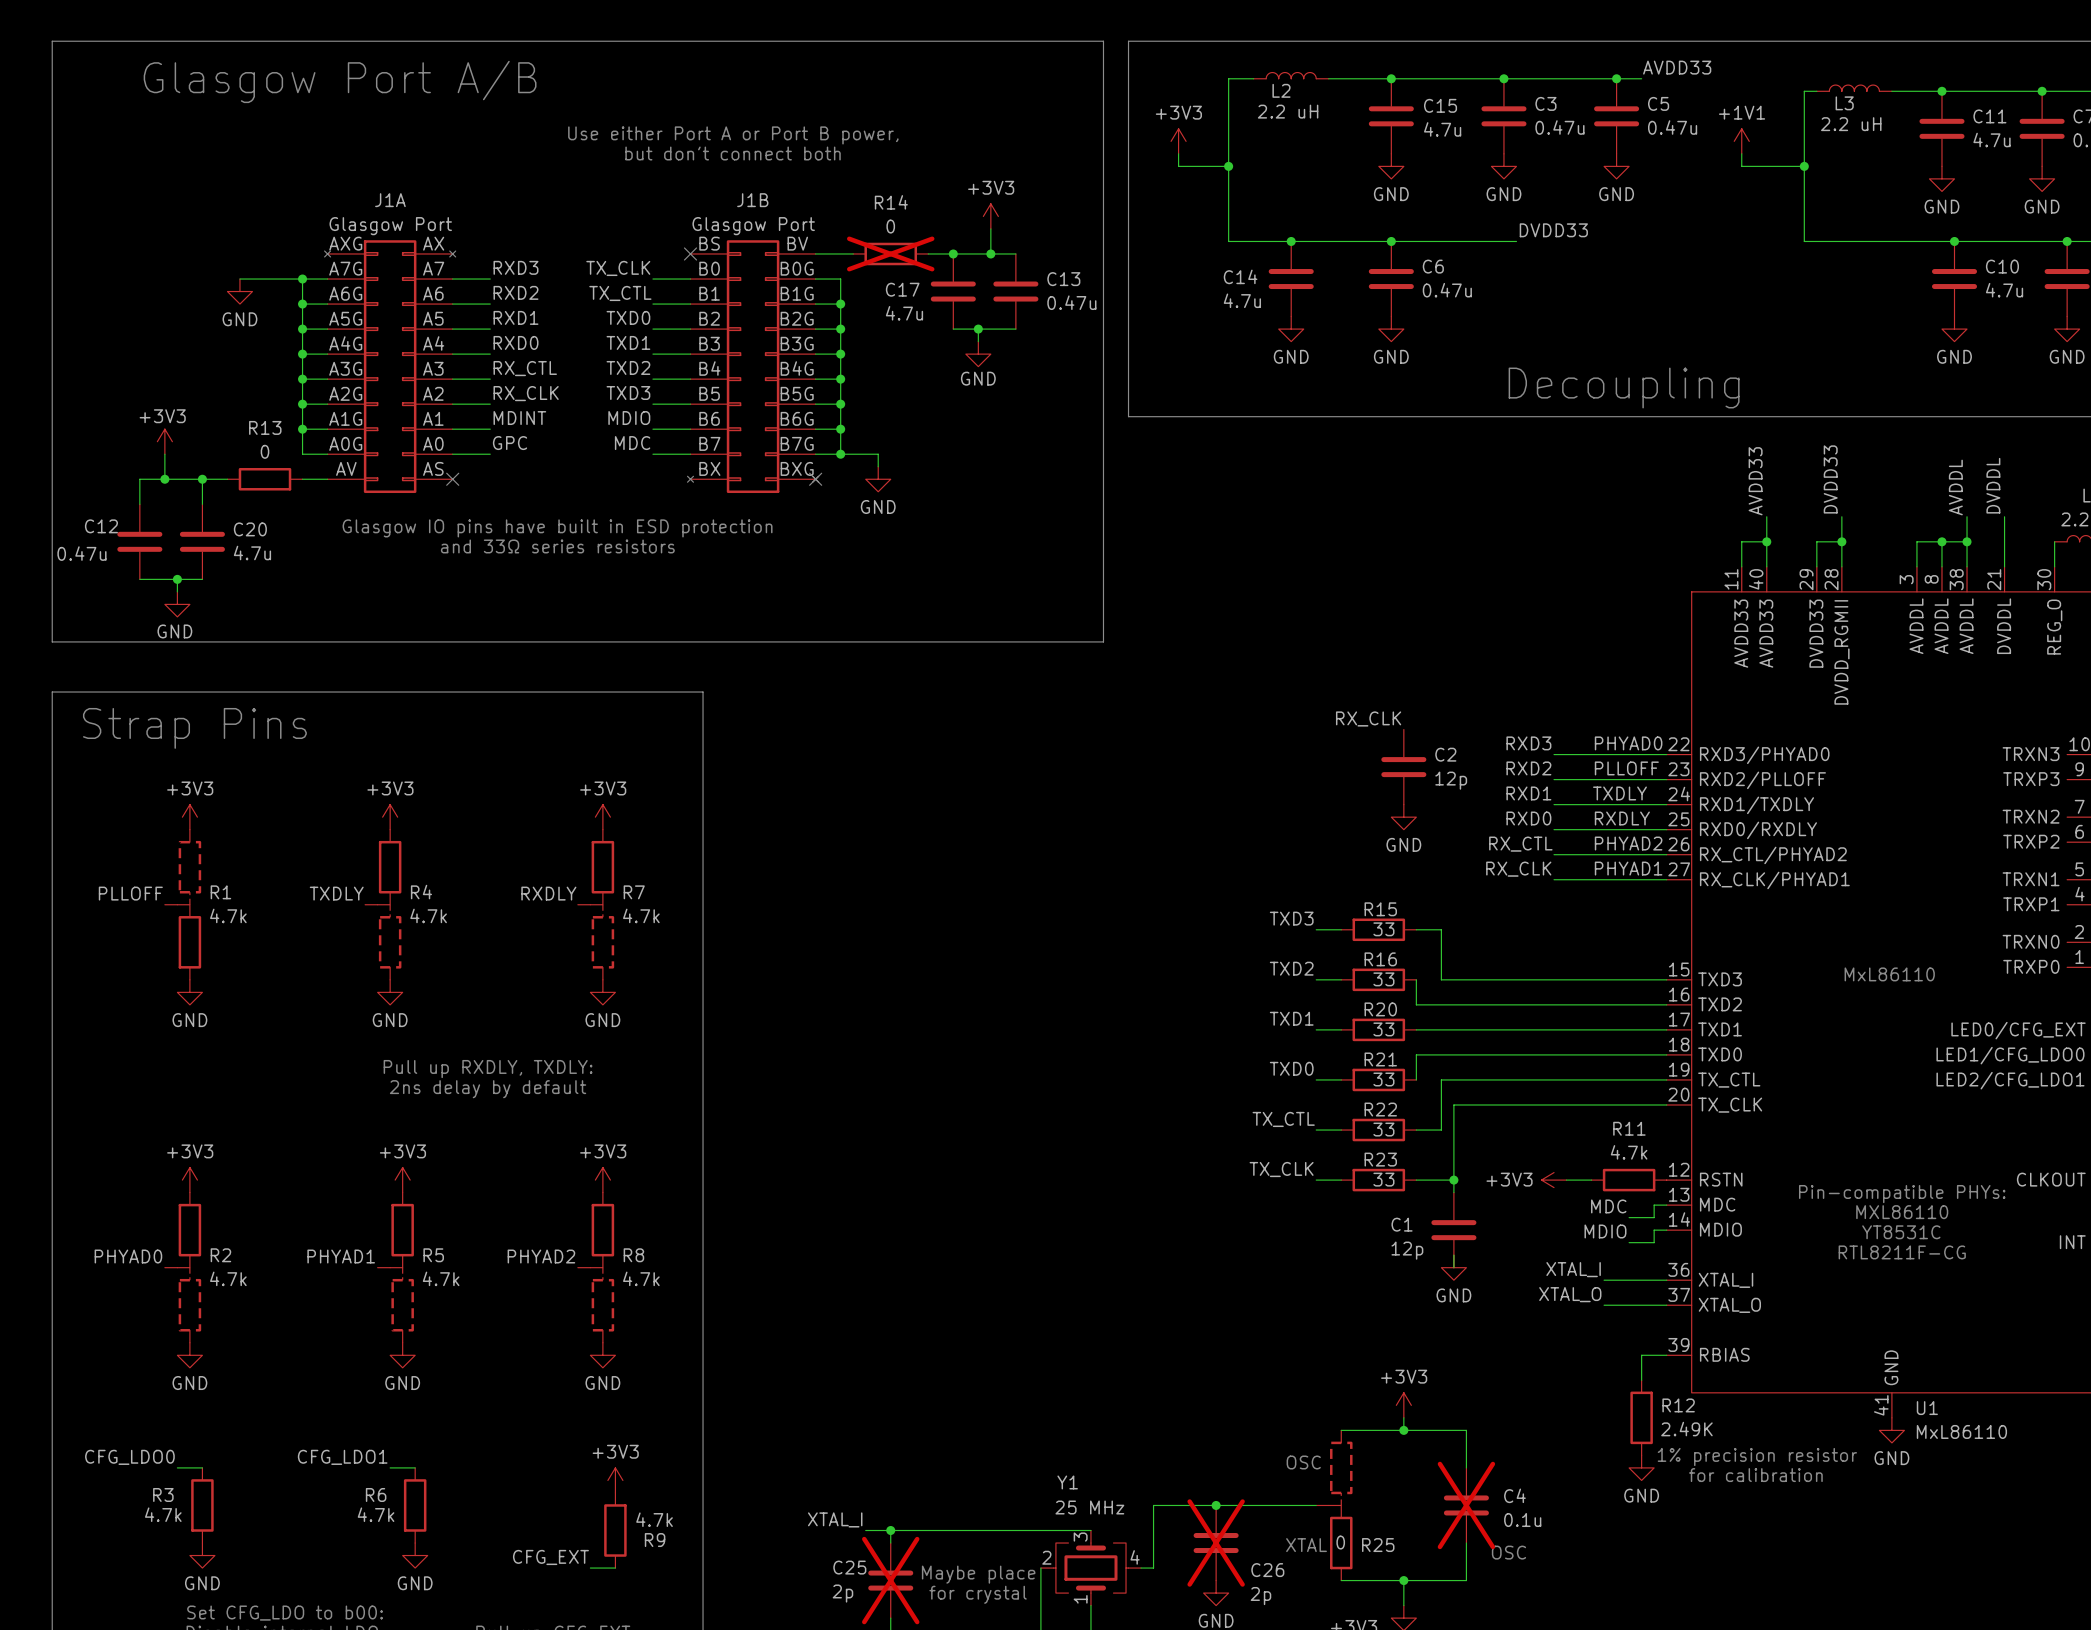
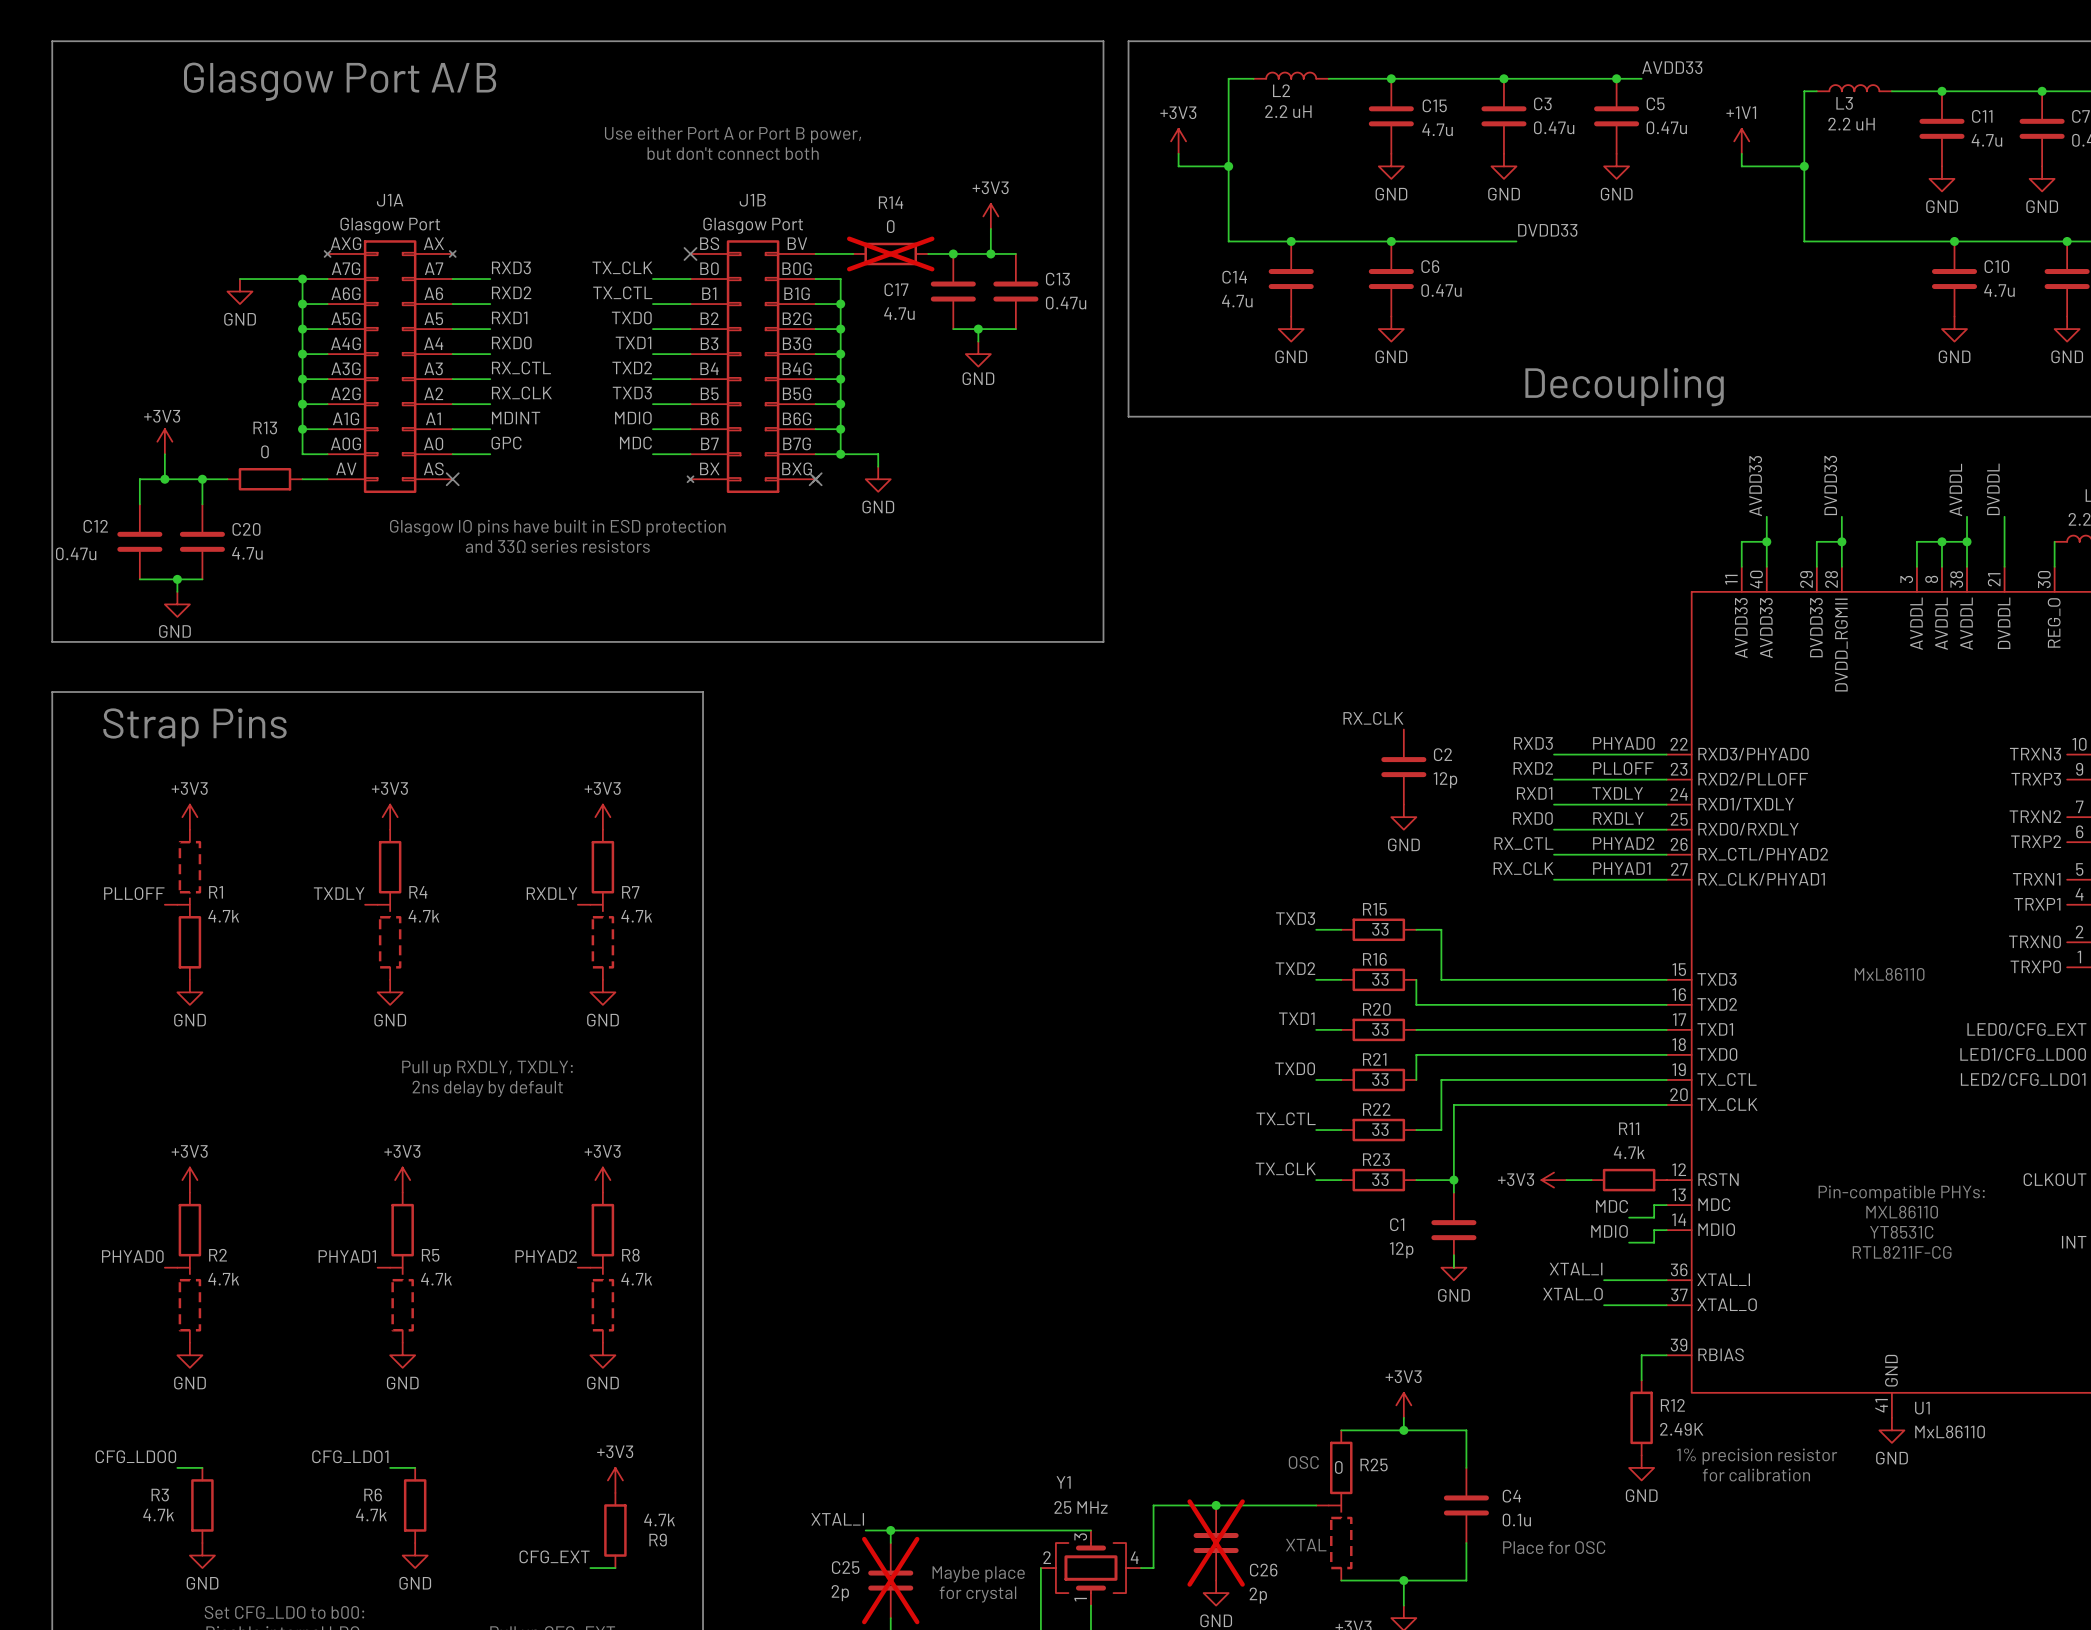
R25 flip: as is (1340, 1505) -> up-down (1340, 1505)
C4 do-not-place cross: (1466, 1505) -> none
text: none -> Place for OSC (1554, 1547)
text: OSC (1508, 1552) -> none

